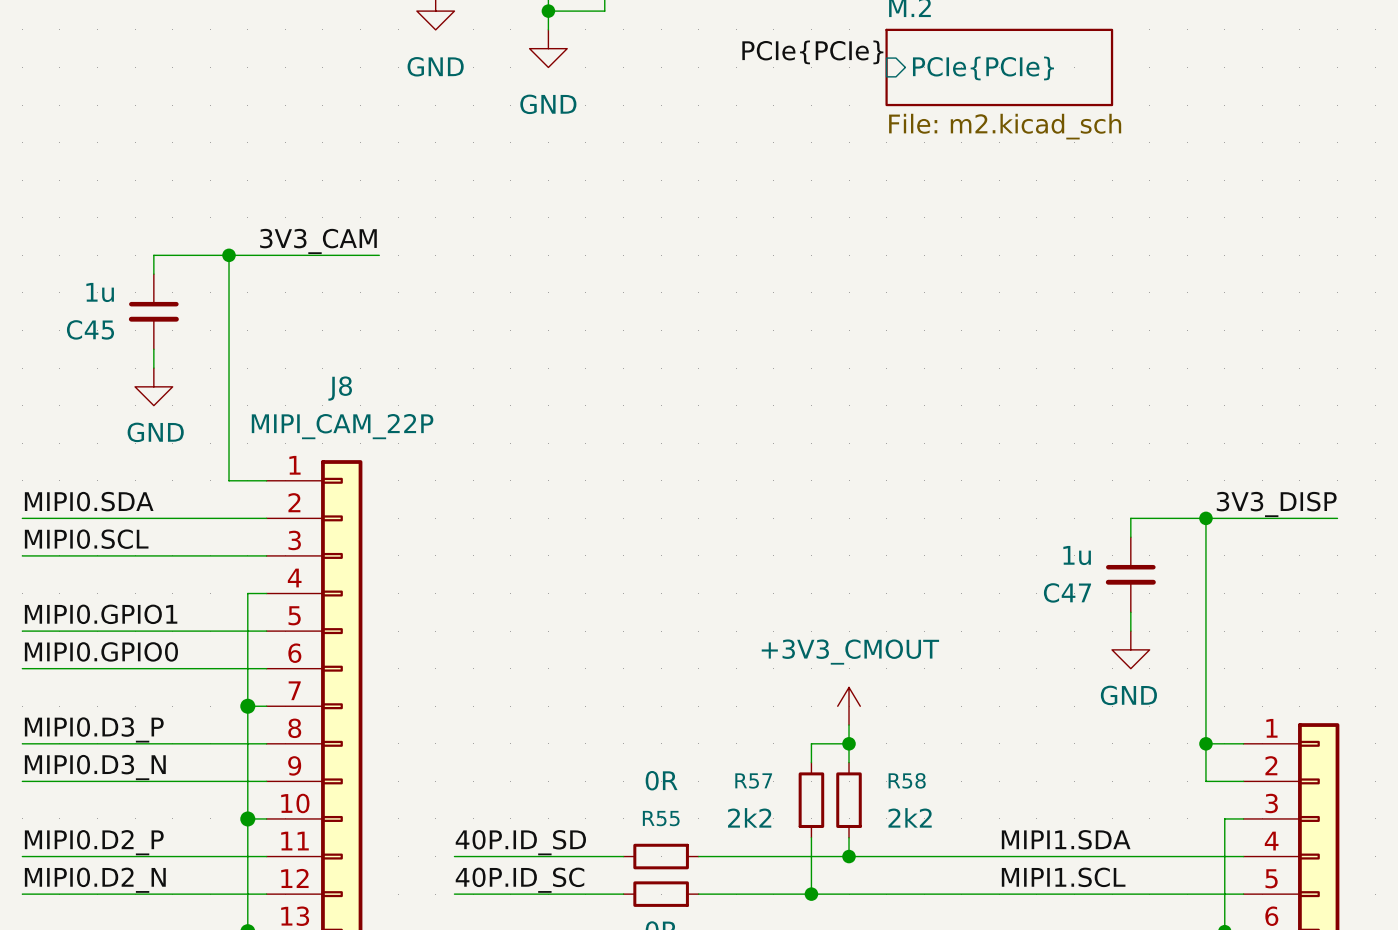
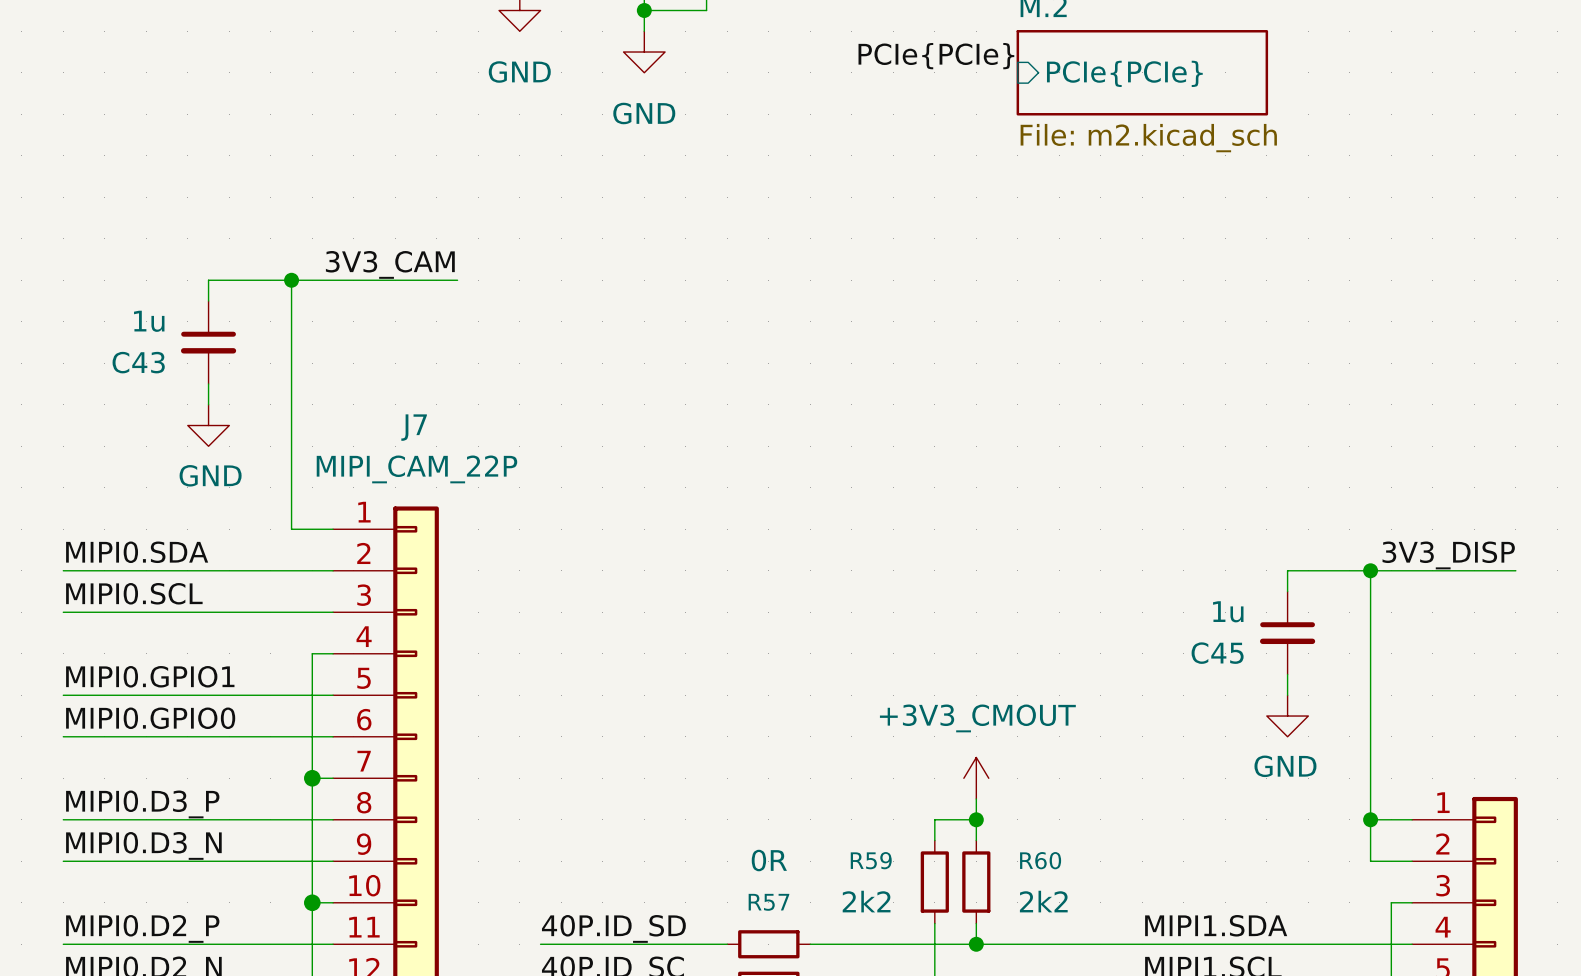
C45 name: C45 (90, 329) -> C43 (138, 362)
J8 name: J8 (340, 388) -> J7 (414, 427)
C47 name: C47 (1067, 592) -> C45 (1217, 653)
R57 name: R57 (753, 780) -> R59 (871, 860)
R58 name: R58 (907, 780) -> R60 (1040, 860)
R55 name: R55 (661, 818) -> R57 (768, 902)

